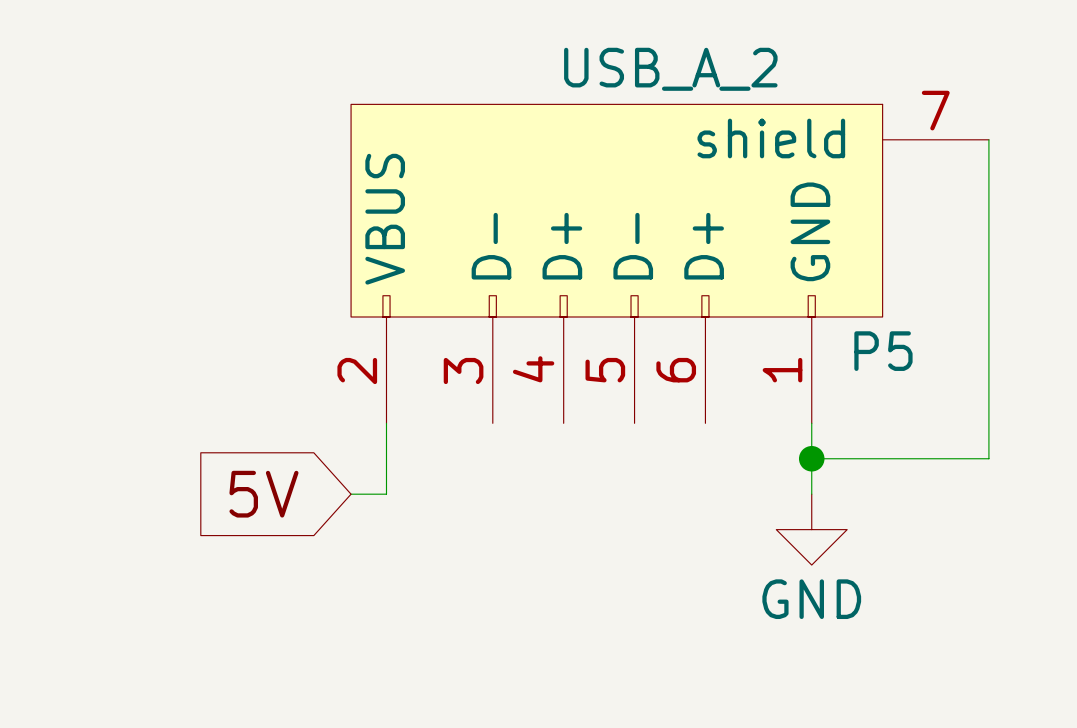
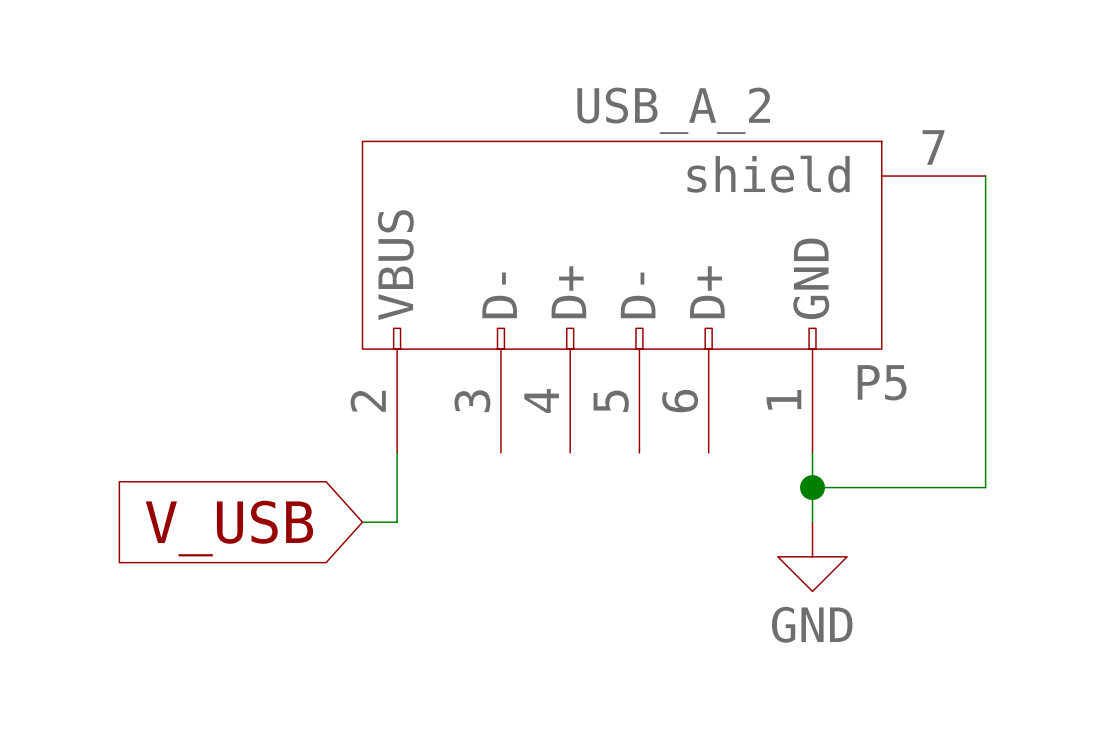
global label: 5V (263, 494) -> V_USB (229, 528)

